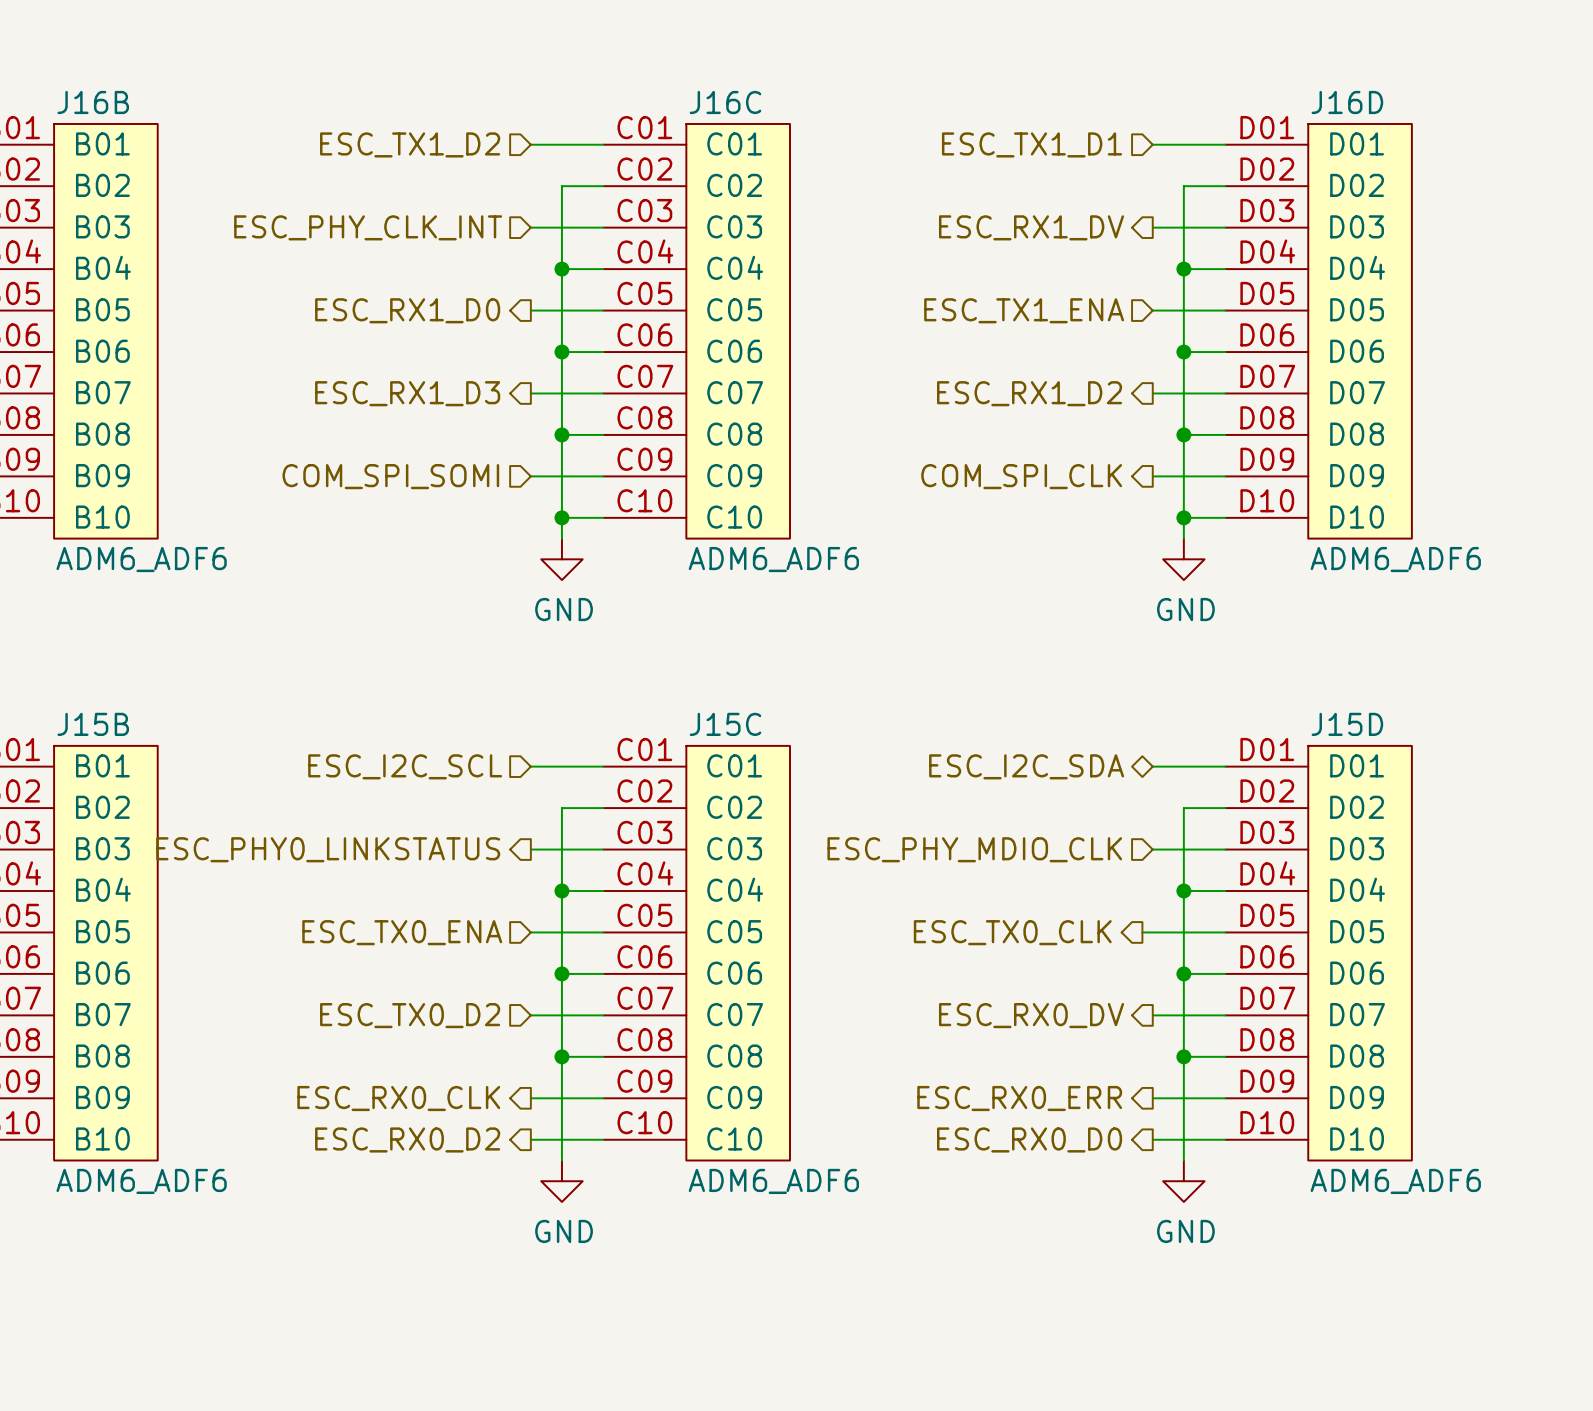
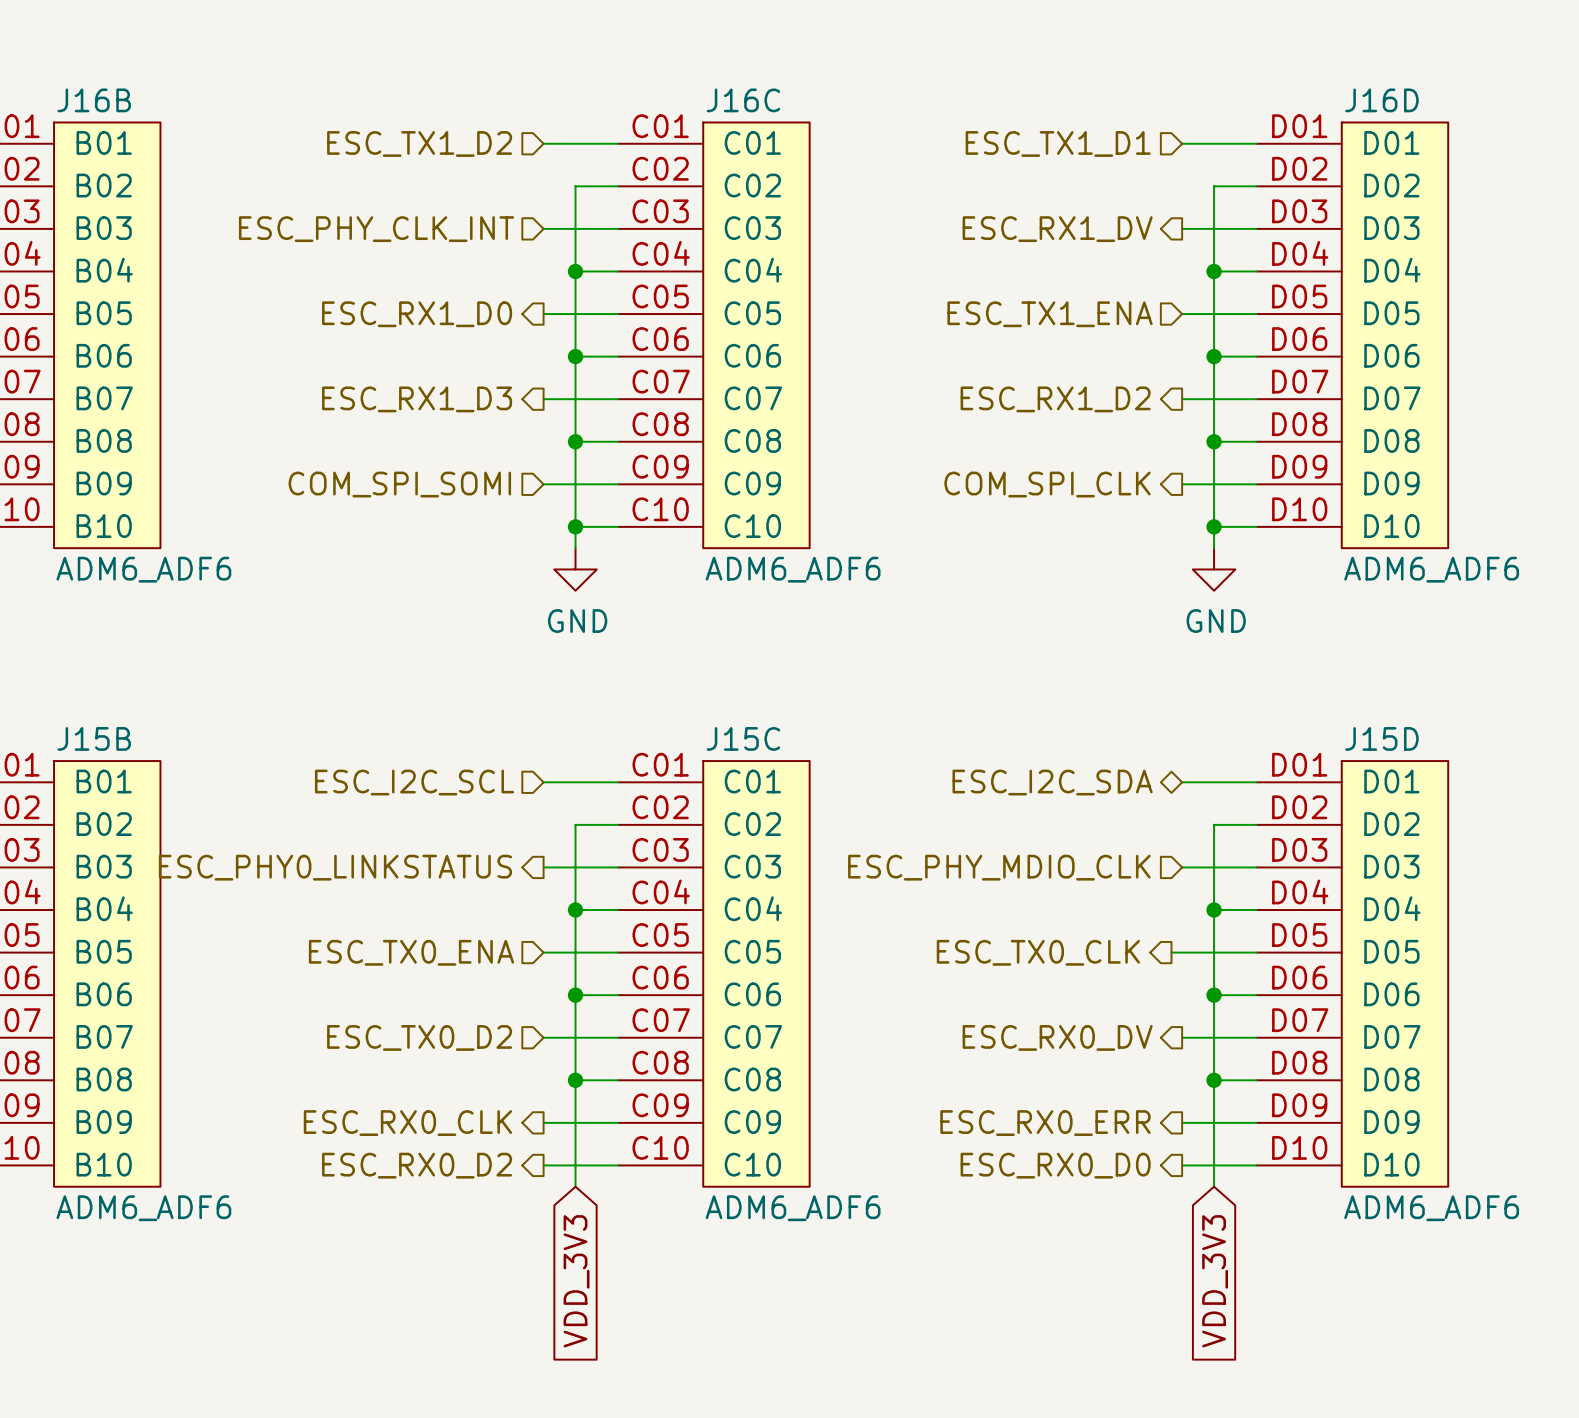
power symbol: GND (561, 1181) -> none
power symbol: GND (1183, 1181) -> none
global label: none -> VDD_3V3 (576, 1281)
global label: none -> VDD_3V3 (1215, 1281)

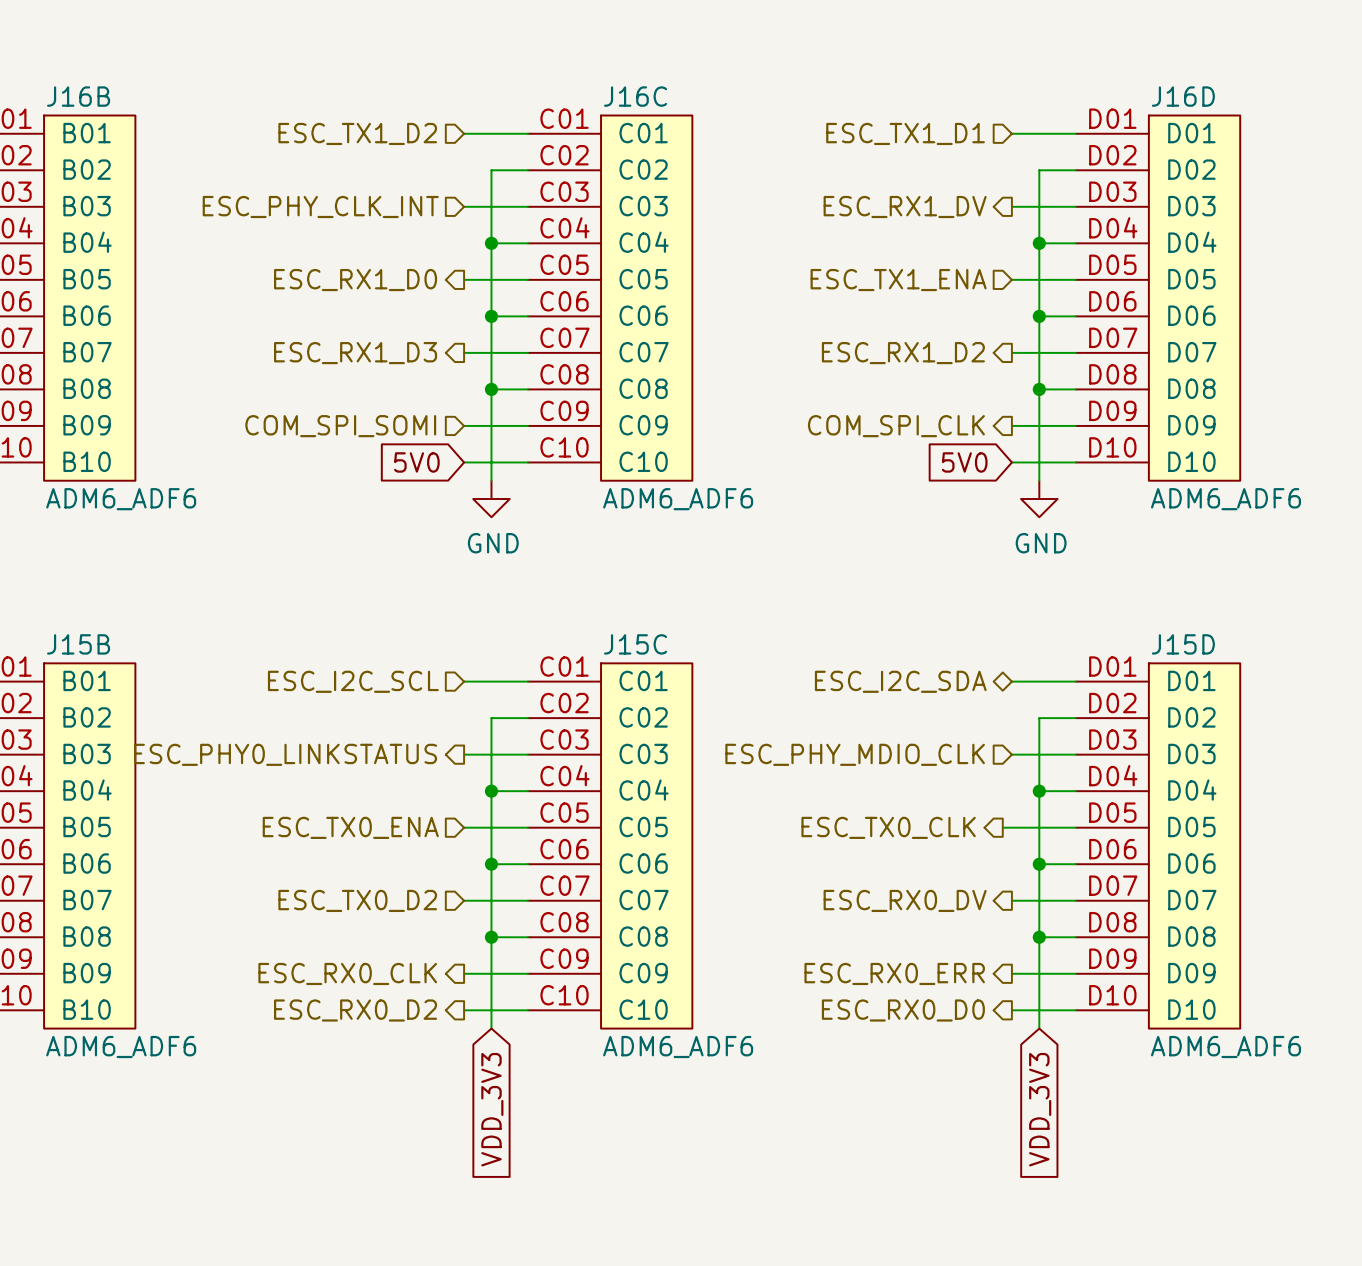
global label: none -> 5V0 (416, 462)
wire: none -> (464, 462) (491, 462)
junction: (575, 526) -> none
global label: none -> 5V0 (964, 462)
wire: none -> (1011, 462) (1039, 462)
junction: (1214, 526) -> none

